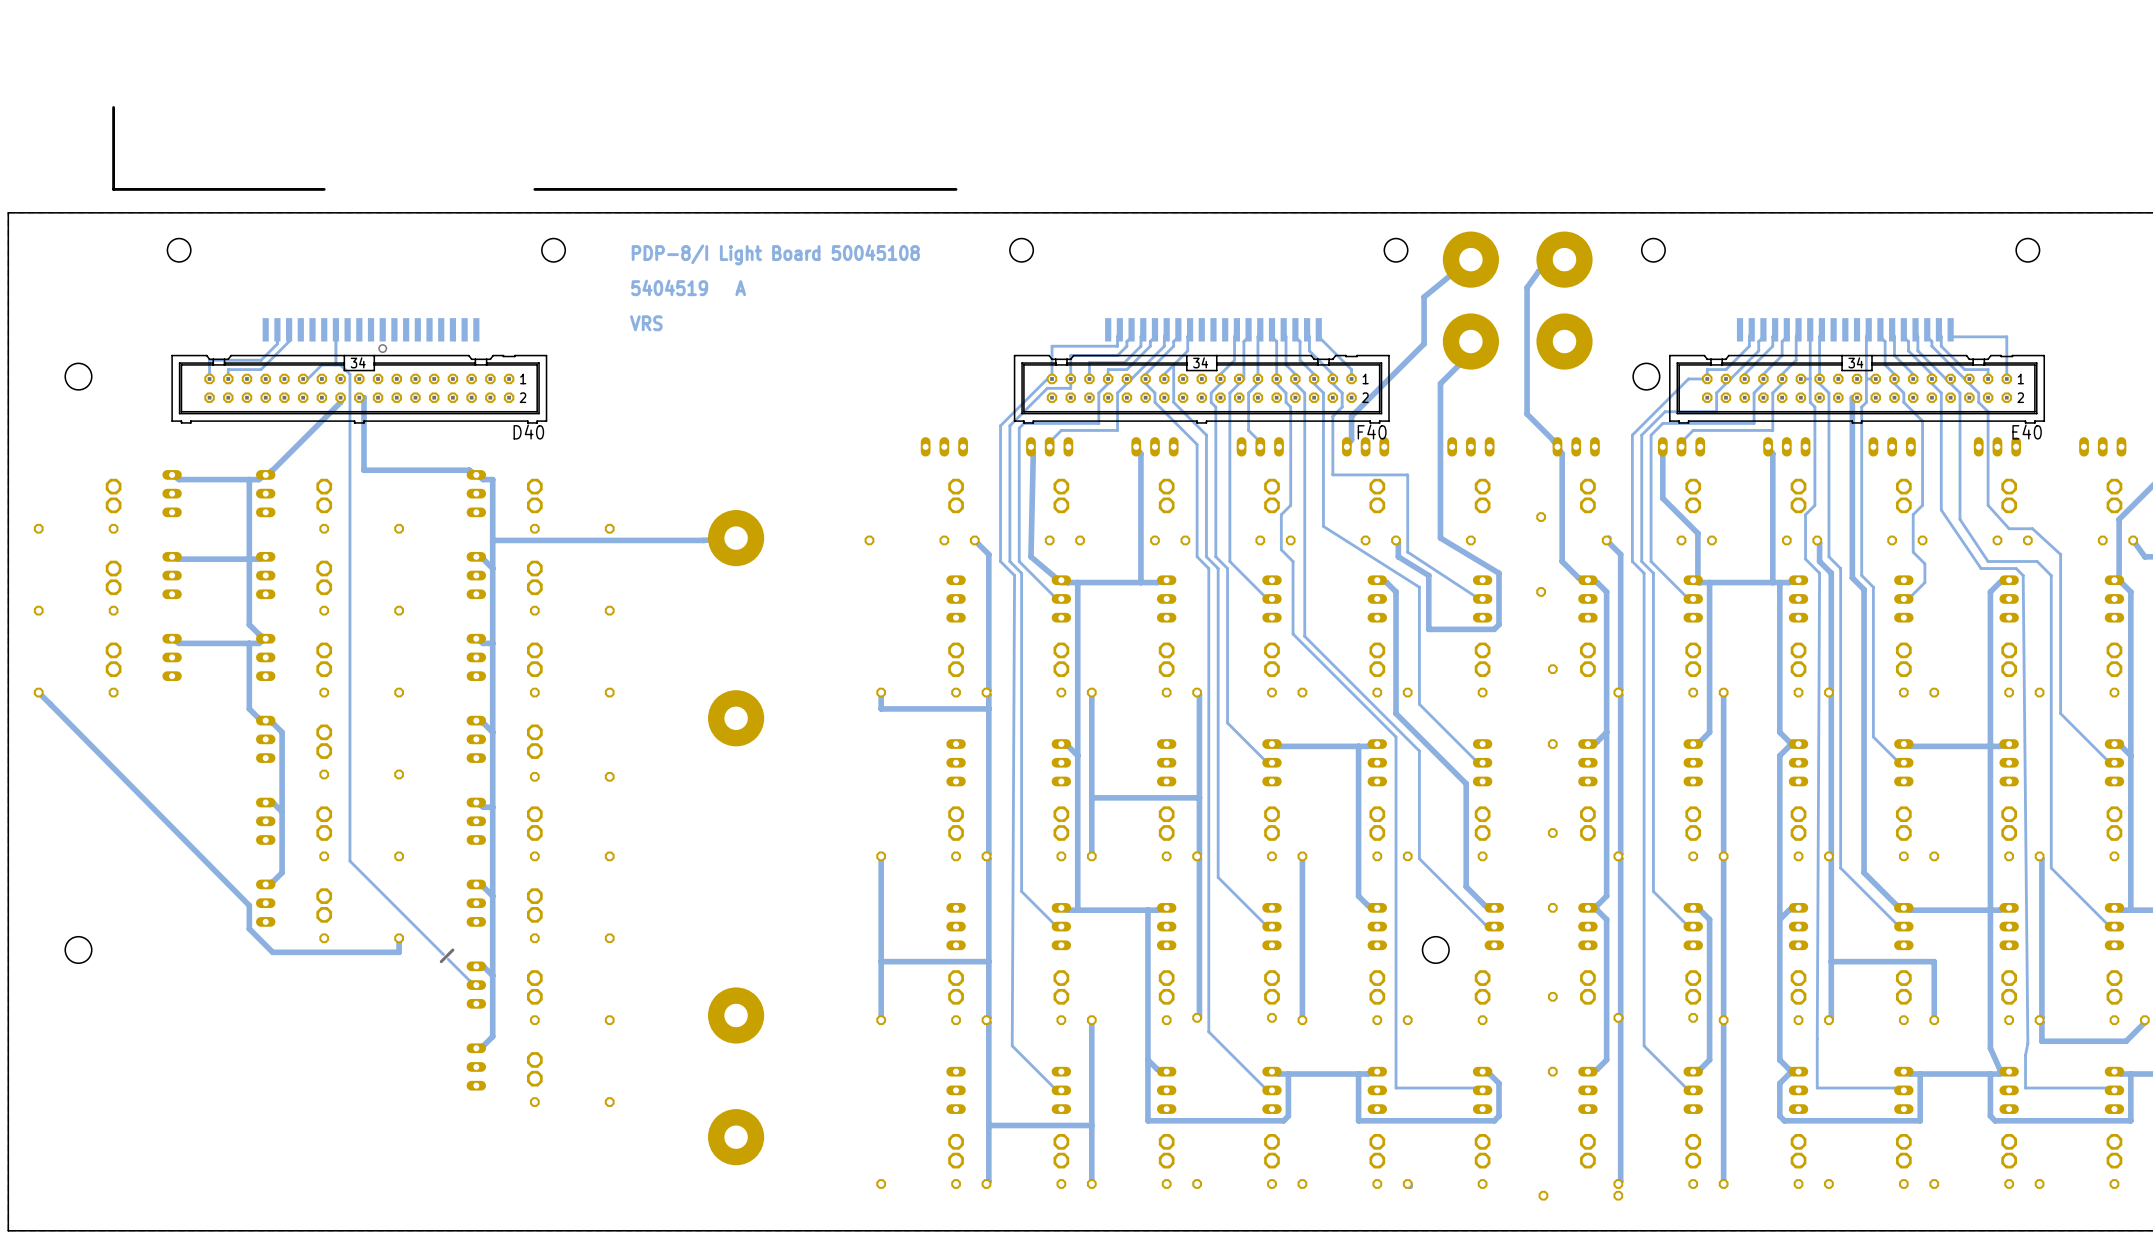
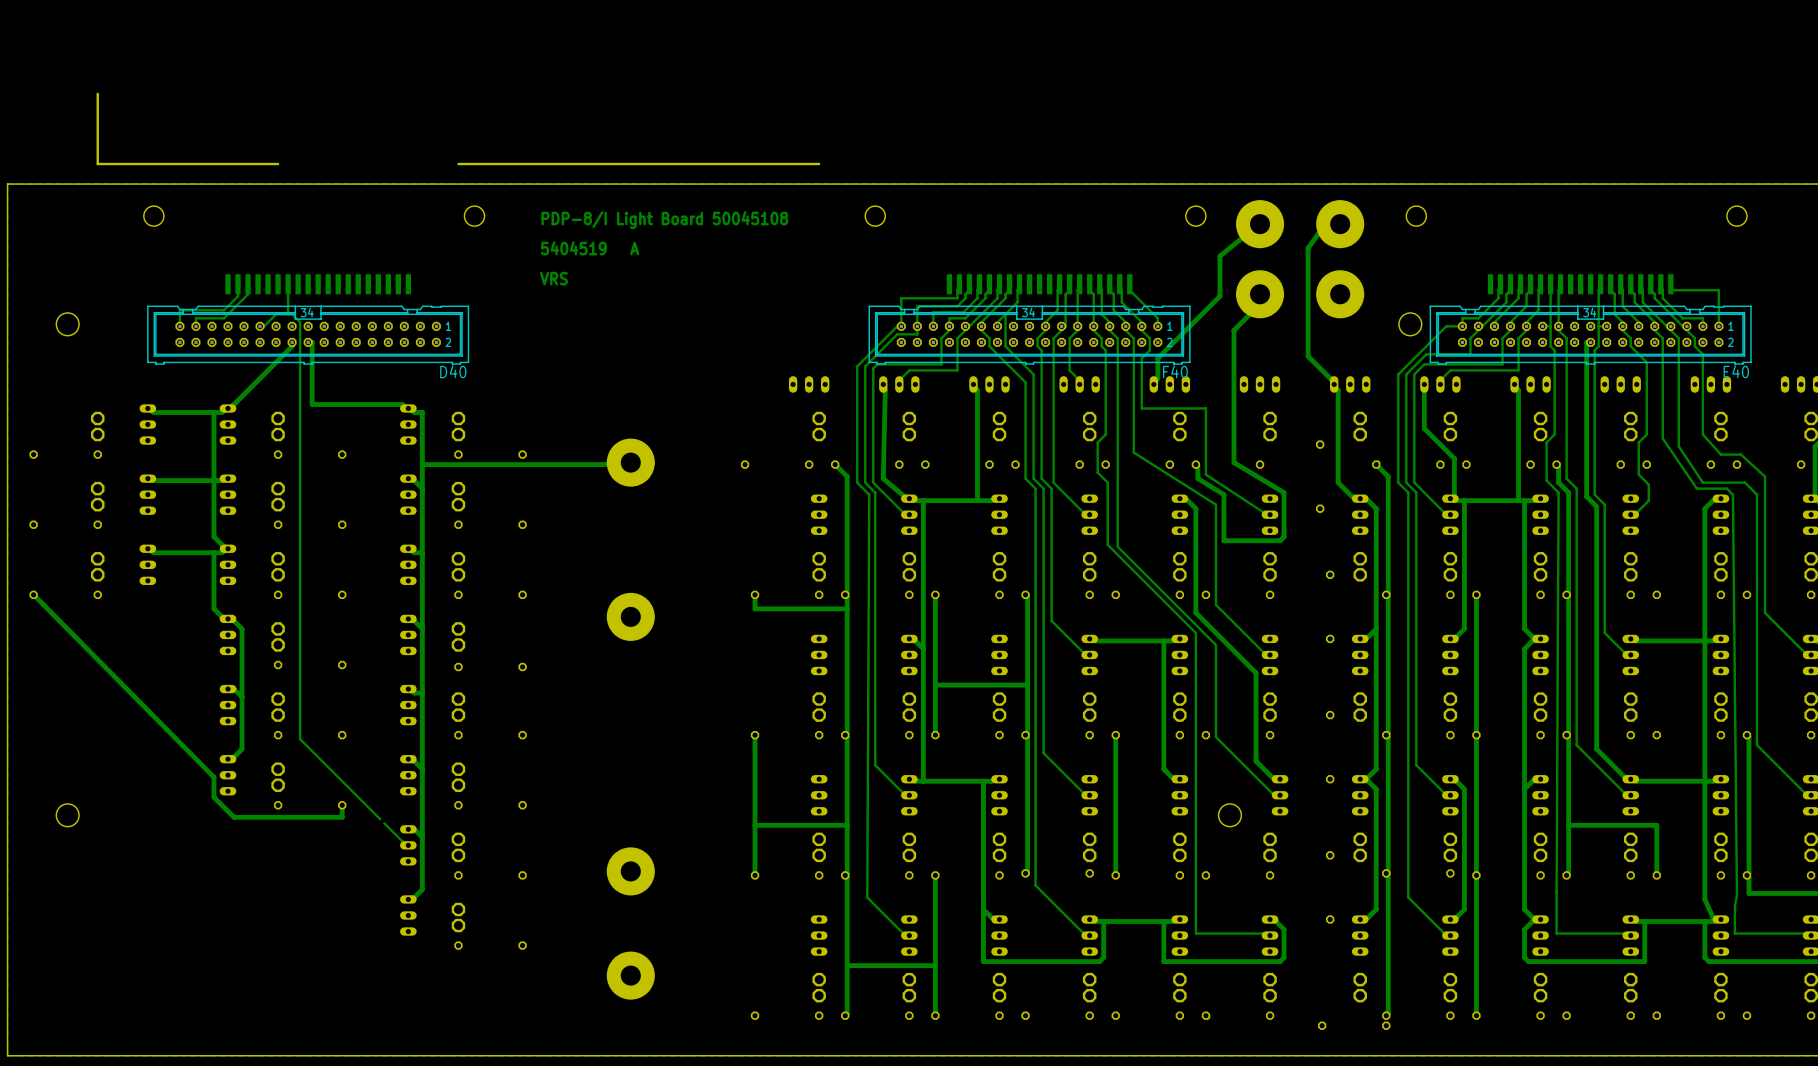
via: (382, 348) -> none
line: (452, 949) (441, 961) -> none

